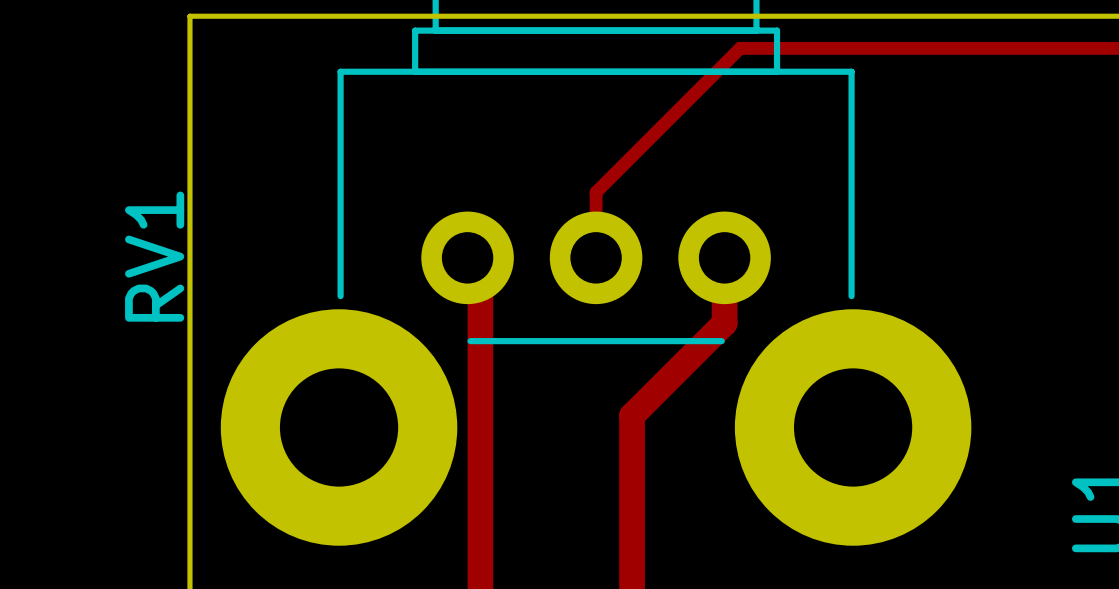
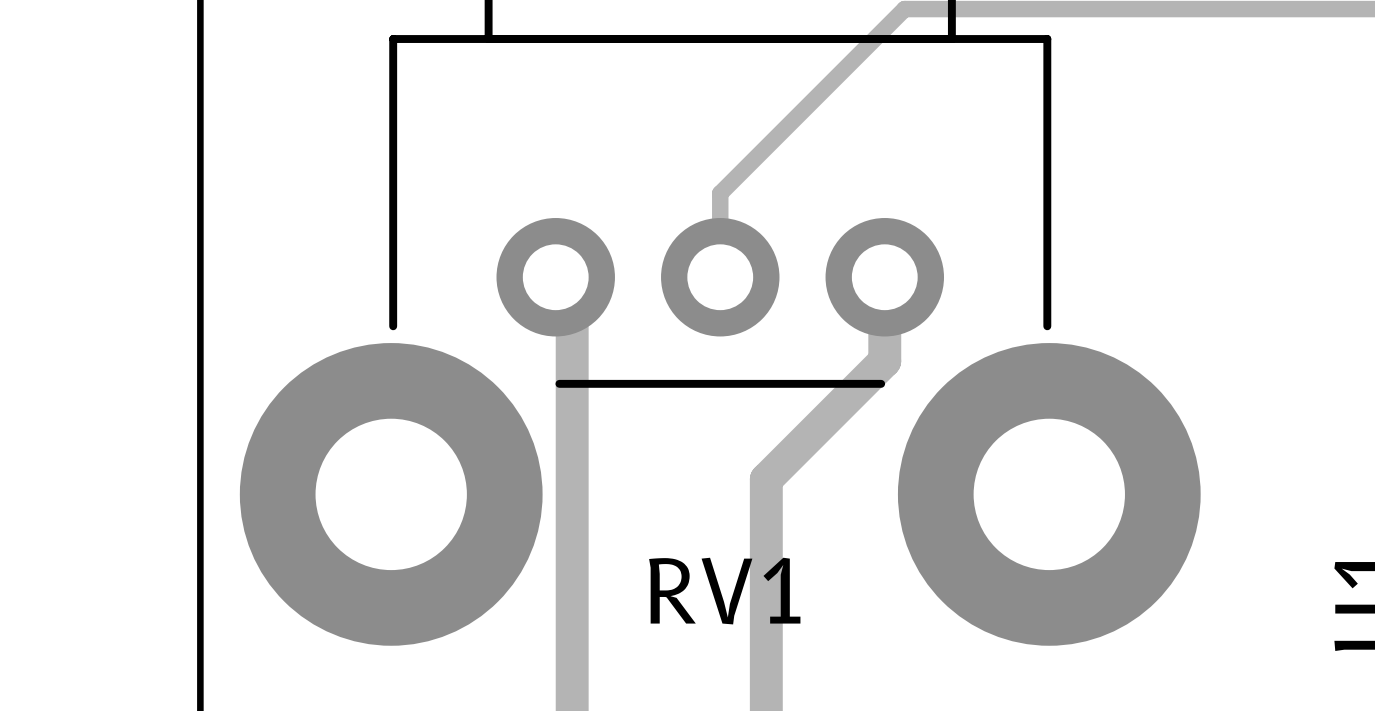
RV1 name rotation: 0° (154, 256) -> 90° clockwise (724, 591)
RV1 name position: RV1 (154, 256) -> RV1 (724, 591)

